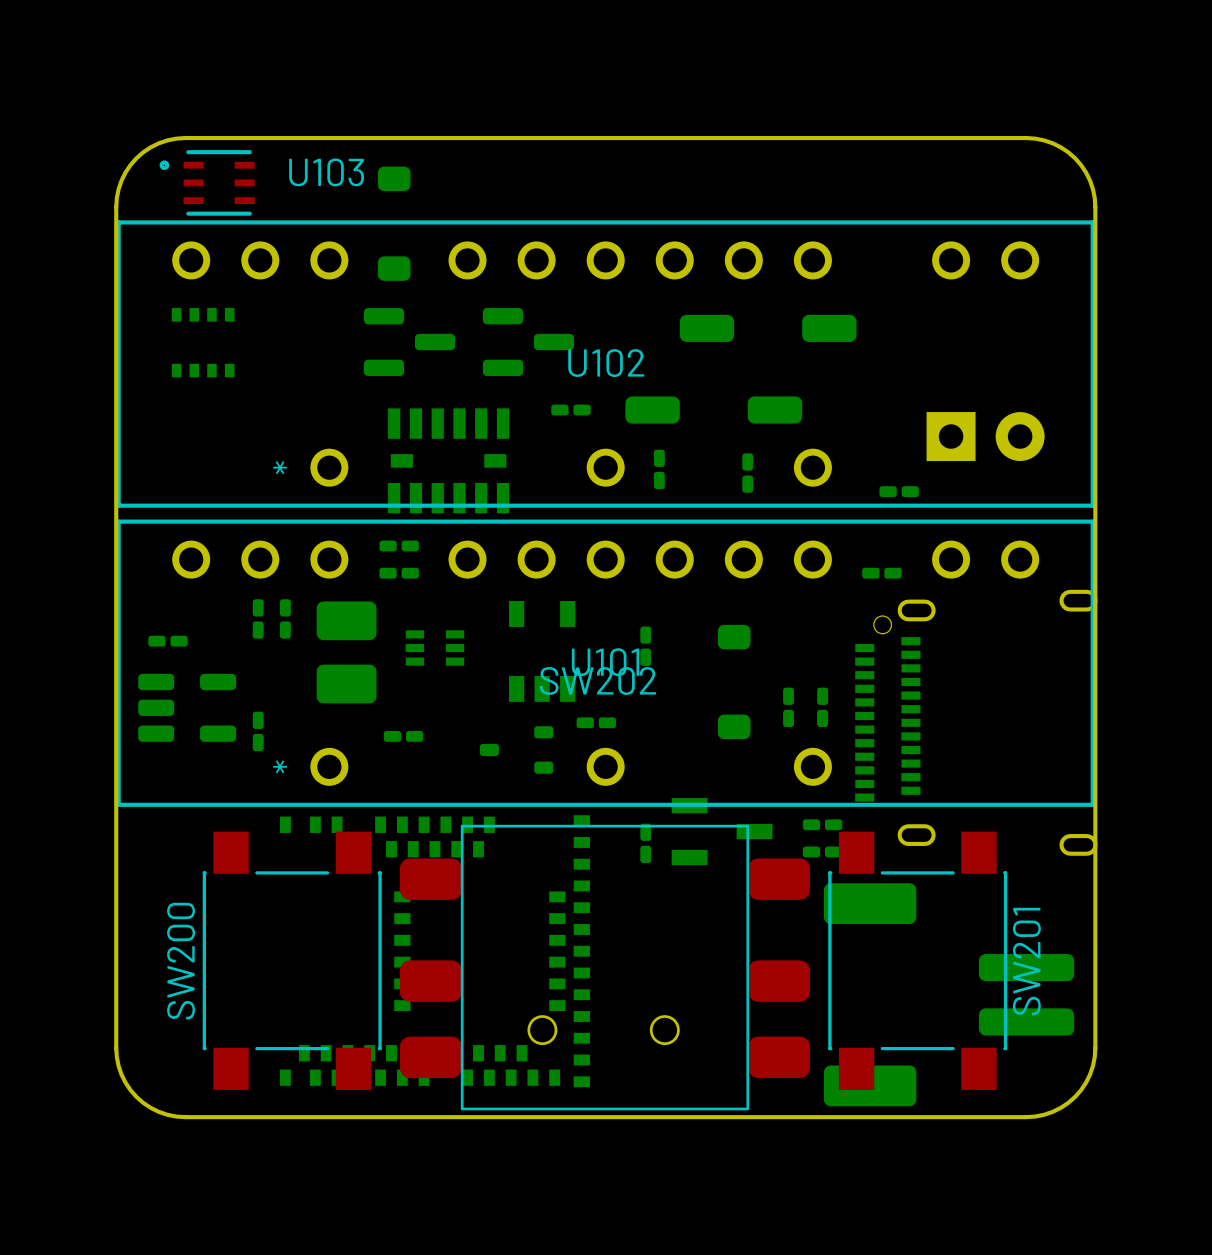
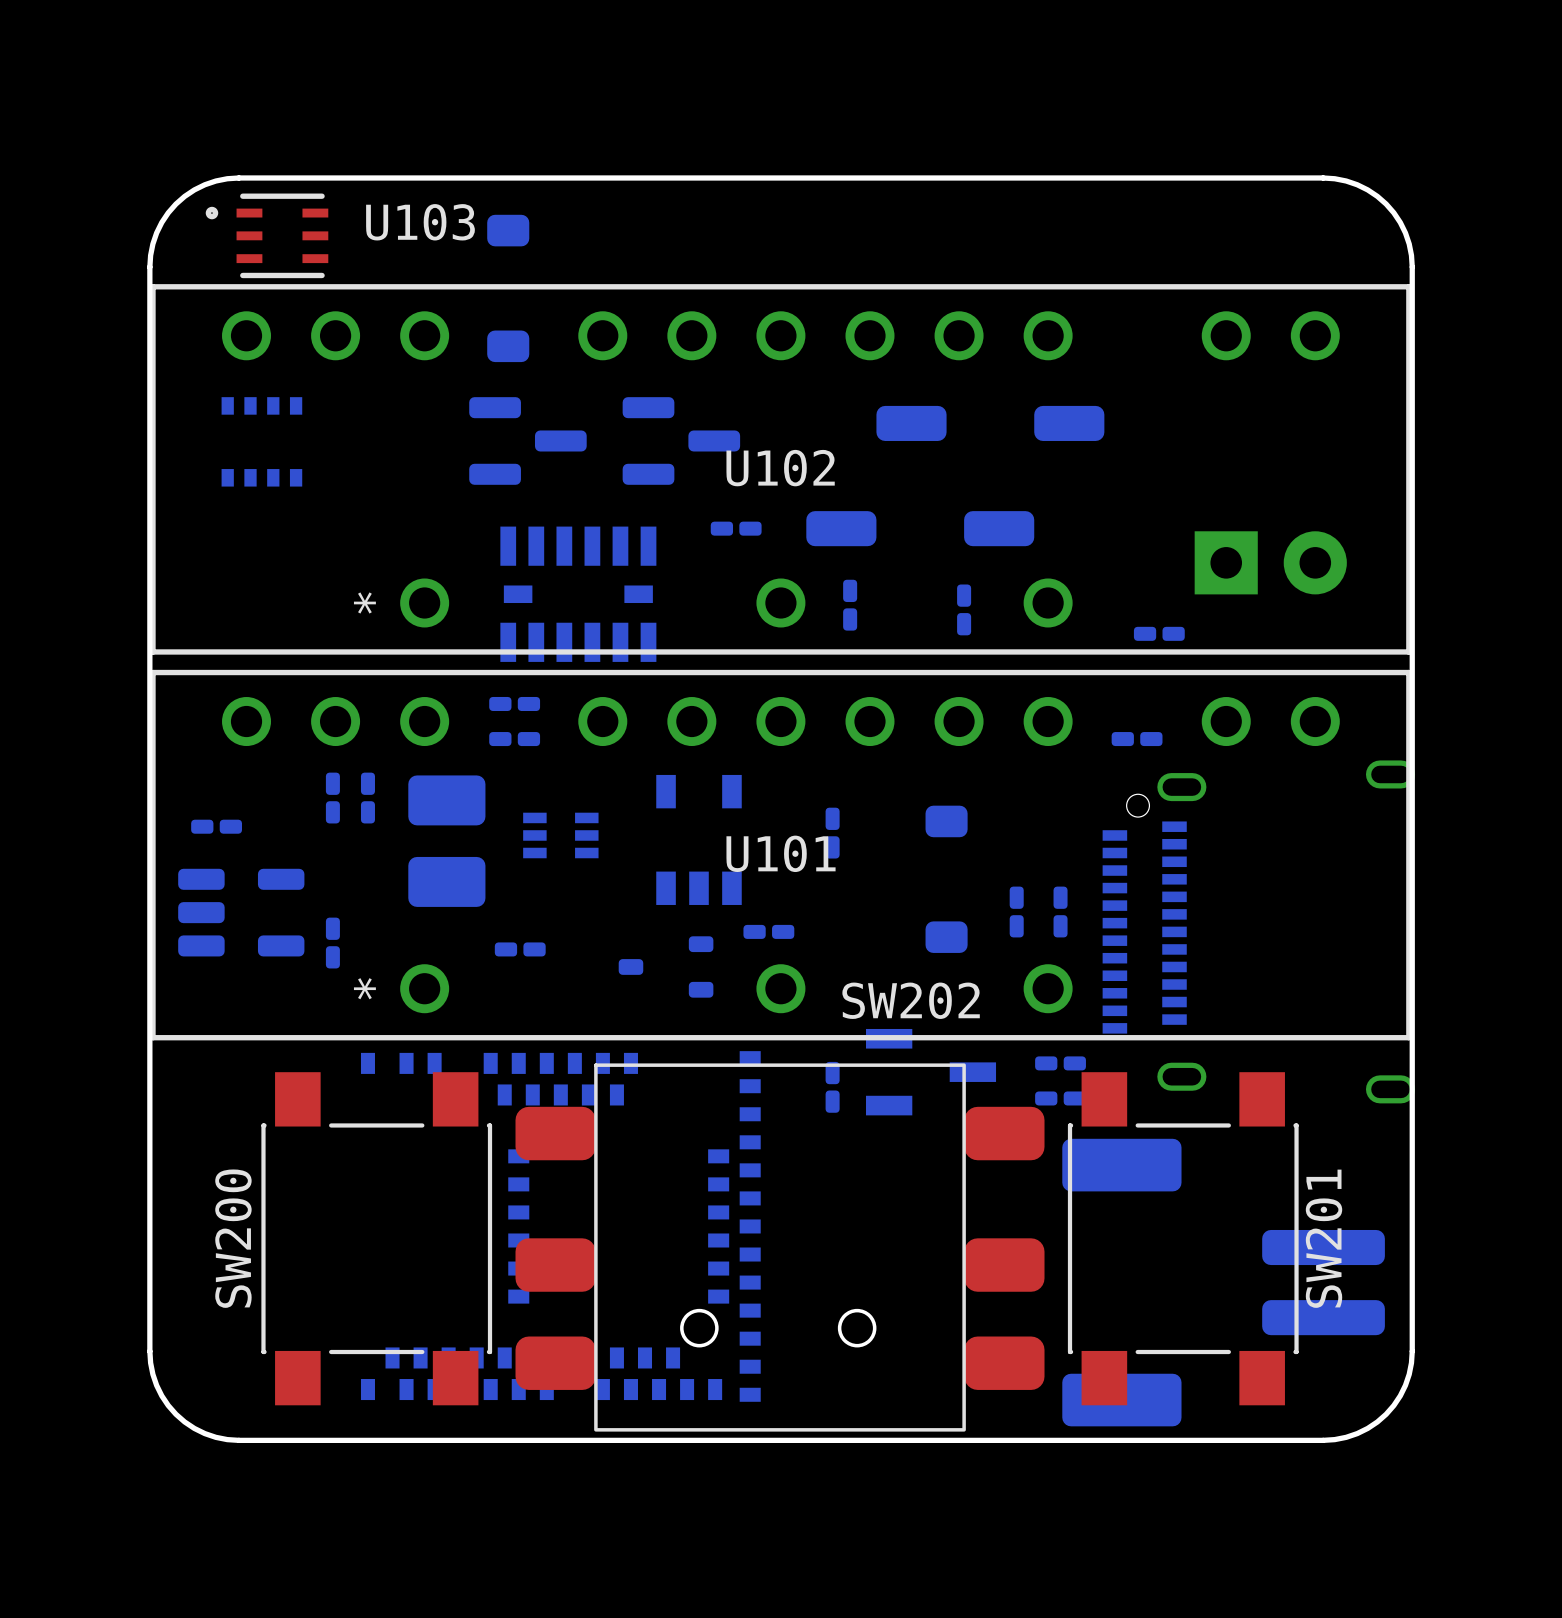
SW202 name position: SW202 (598, 680) -> SW202 (911, 1000)

